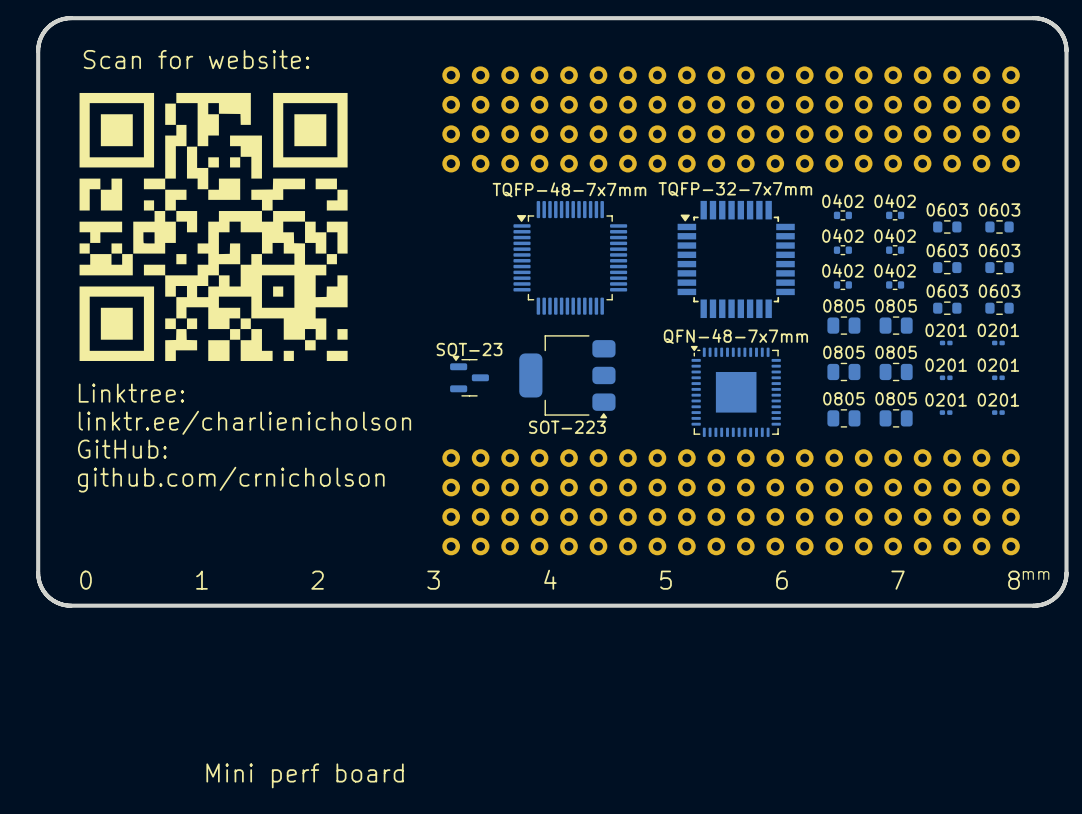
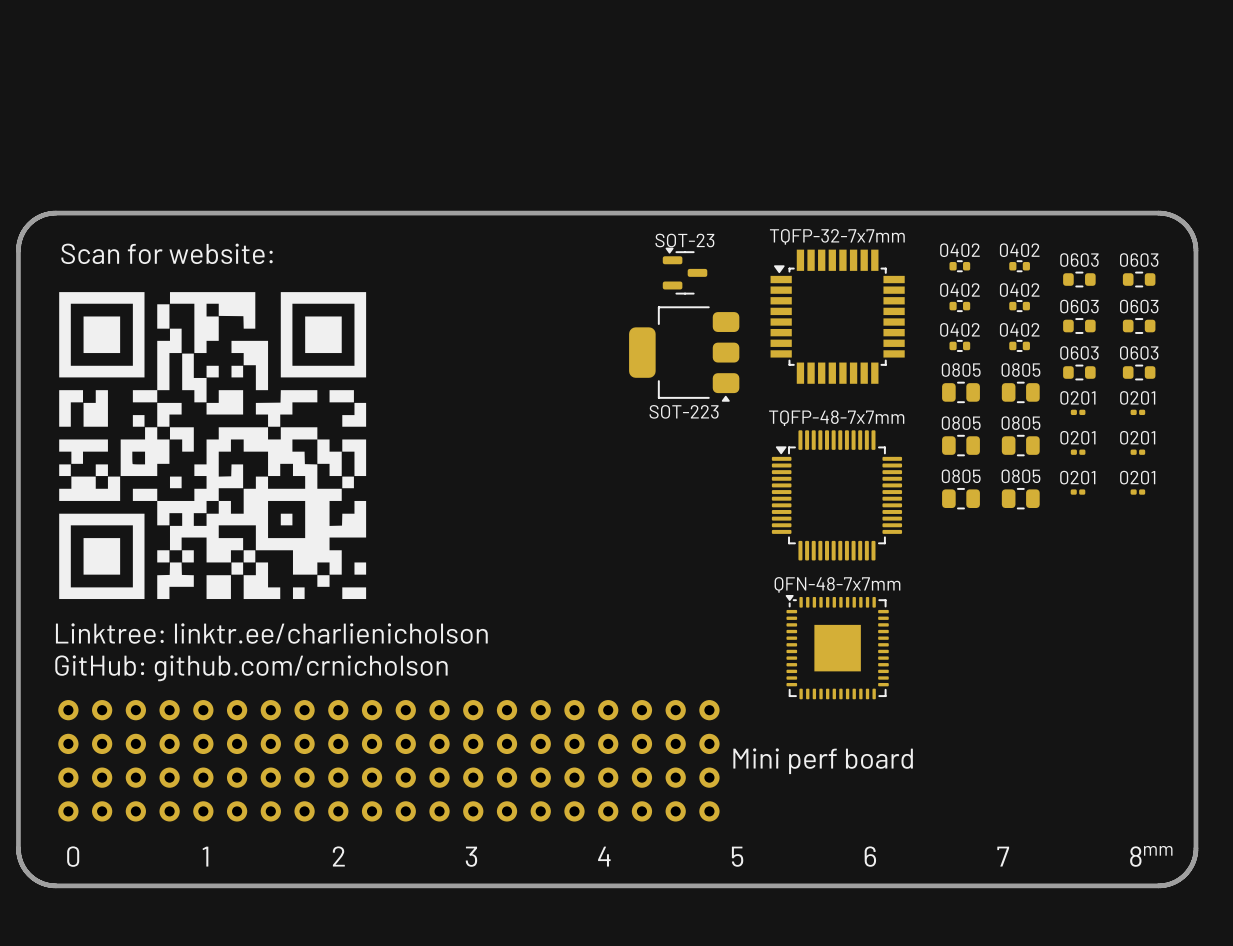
board edge: (1035, 18) (1047, 21) (1058, 28) (1064, 39) (1066, 50) (1066, 574) (1061, 589) (1049, 601) (1033, 605) (70, 605) (53, 600) (42, 588) (38, 572) (38, 50) (42, 33) (55, 22) (70, 18) (1035, 18) -> (1160, 213) (1173, 216) (1184, 224) (1193, 235) (1195, 248) (1195, 850) (1190, 867) (1177, 880) (1158, 885) (55, 885) (38, 881) (23, 867) (18, 848) (18, 250) (22, 232) (36, 218) (55, 213) (1160, 213)
text position: Scan for website: (196, 59) -> Scan for website: (167, 253)
part: (731, 119) -> none
drawing position: (213, 226) -> (212, 445)
TQFP-48-7x7mm position: (570, 257) -> (836, 495)
SOT-23 position: (469, 376) -> (685, 271)
SOT-223 position: (567, 376) -> (684, 354)
QFN-48-7x7mm position: (735, 391) -> (837, 647)
text: Linktree: (131, 393) -> none
text: linktr.ee/charlienicholson (244, 422) -> none
text: GitHub: (122, 449) -> none
text: github.com/crnicholson (231, 479) -> none
part: (731, 502) -> none
text: none -> Linktree: linktr.ee/charlienicholson (271, 633)
text: none -> GitHub: github.com/crnicholson (251, 668)
text position: mm (1036, 575) -> mm (1158, 850)
drawing position: (549, 579) -> (604, 856)
part: none -> (388, 760)
text: none -> Mini perf board (823, 761)
text: Mini perf board (305, 775) -> none

